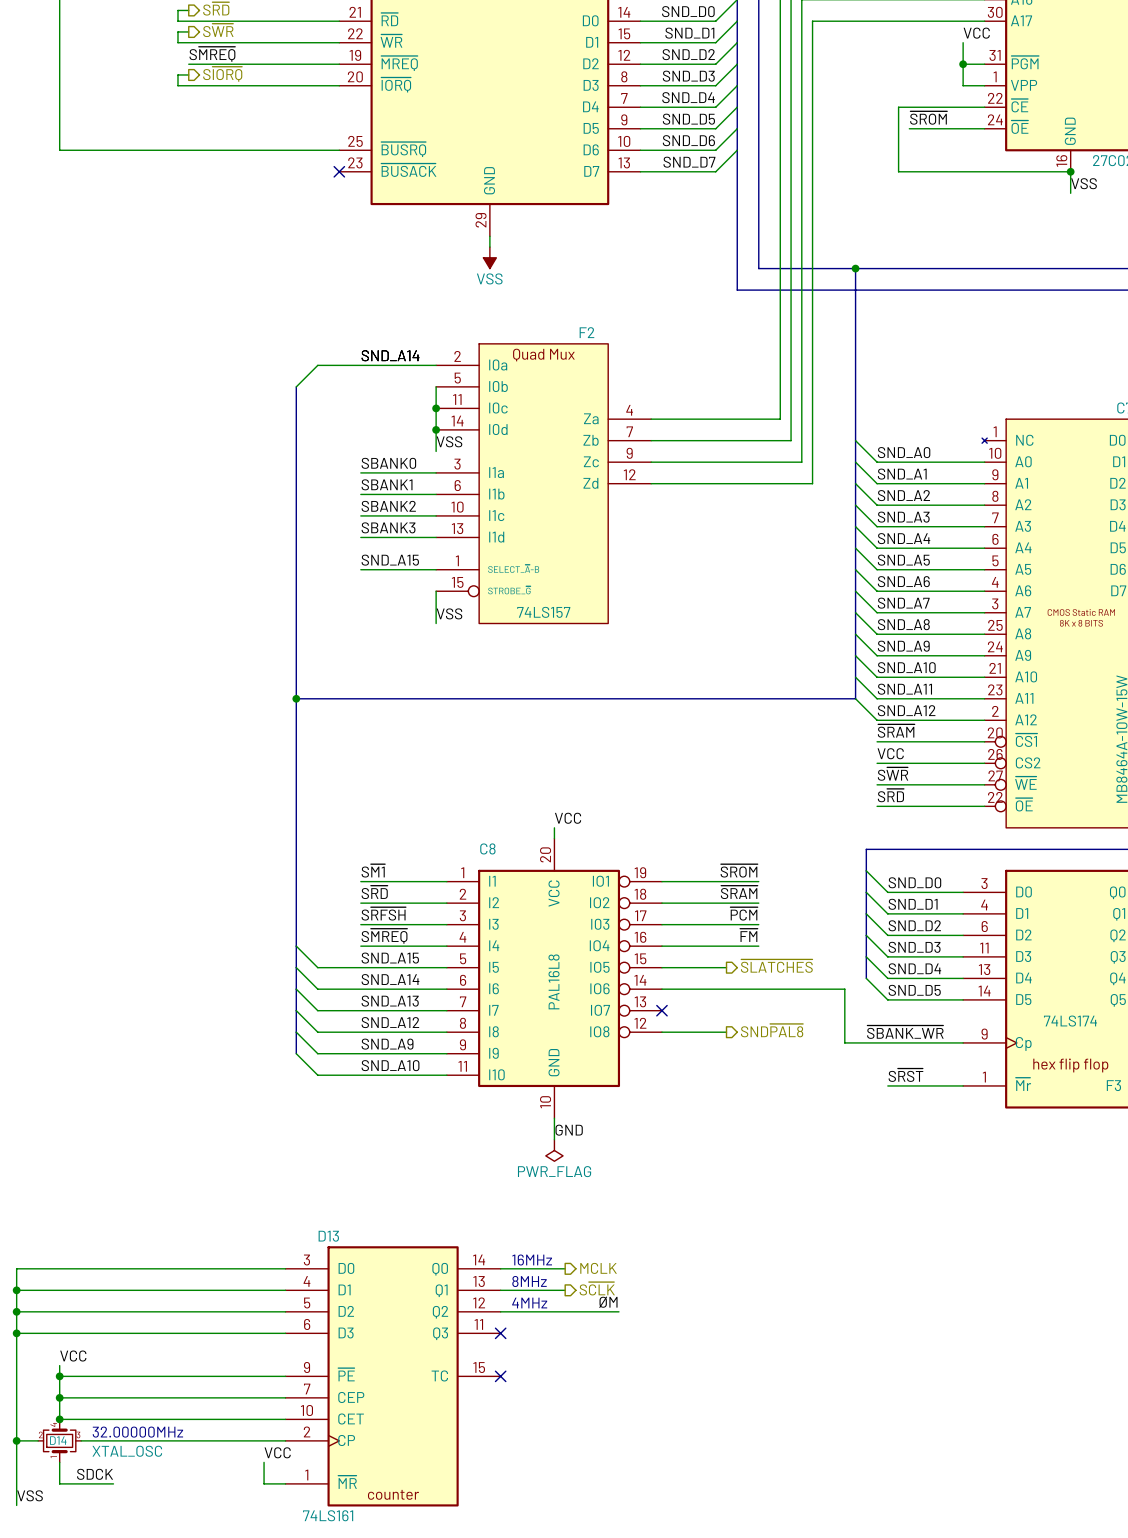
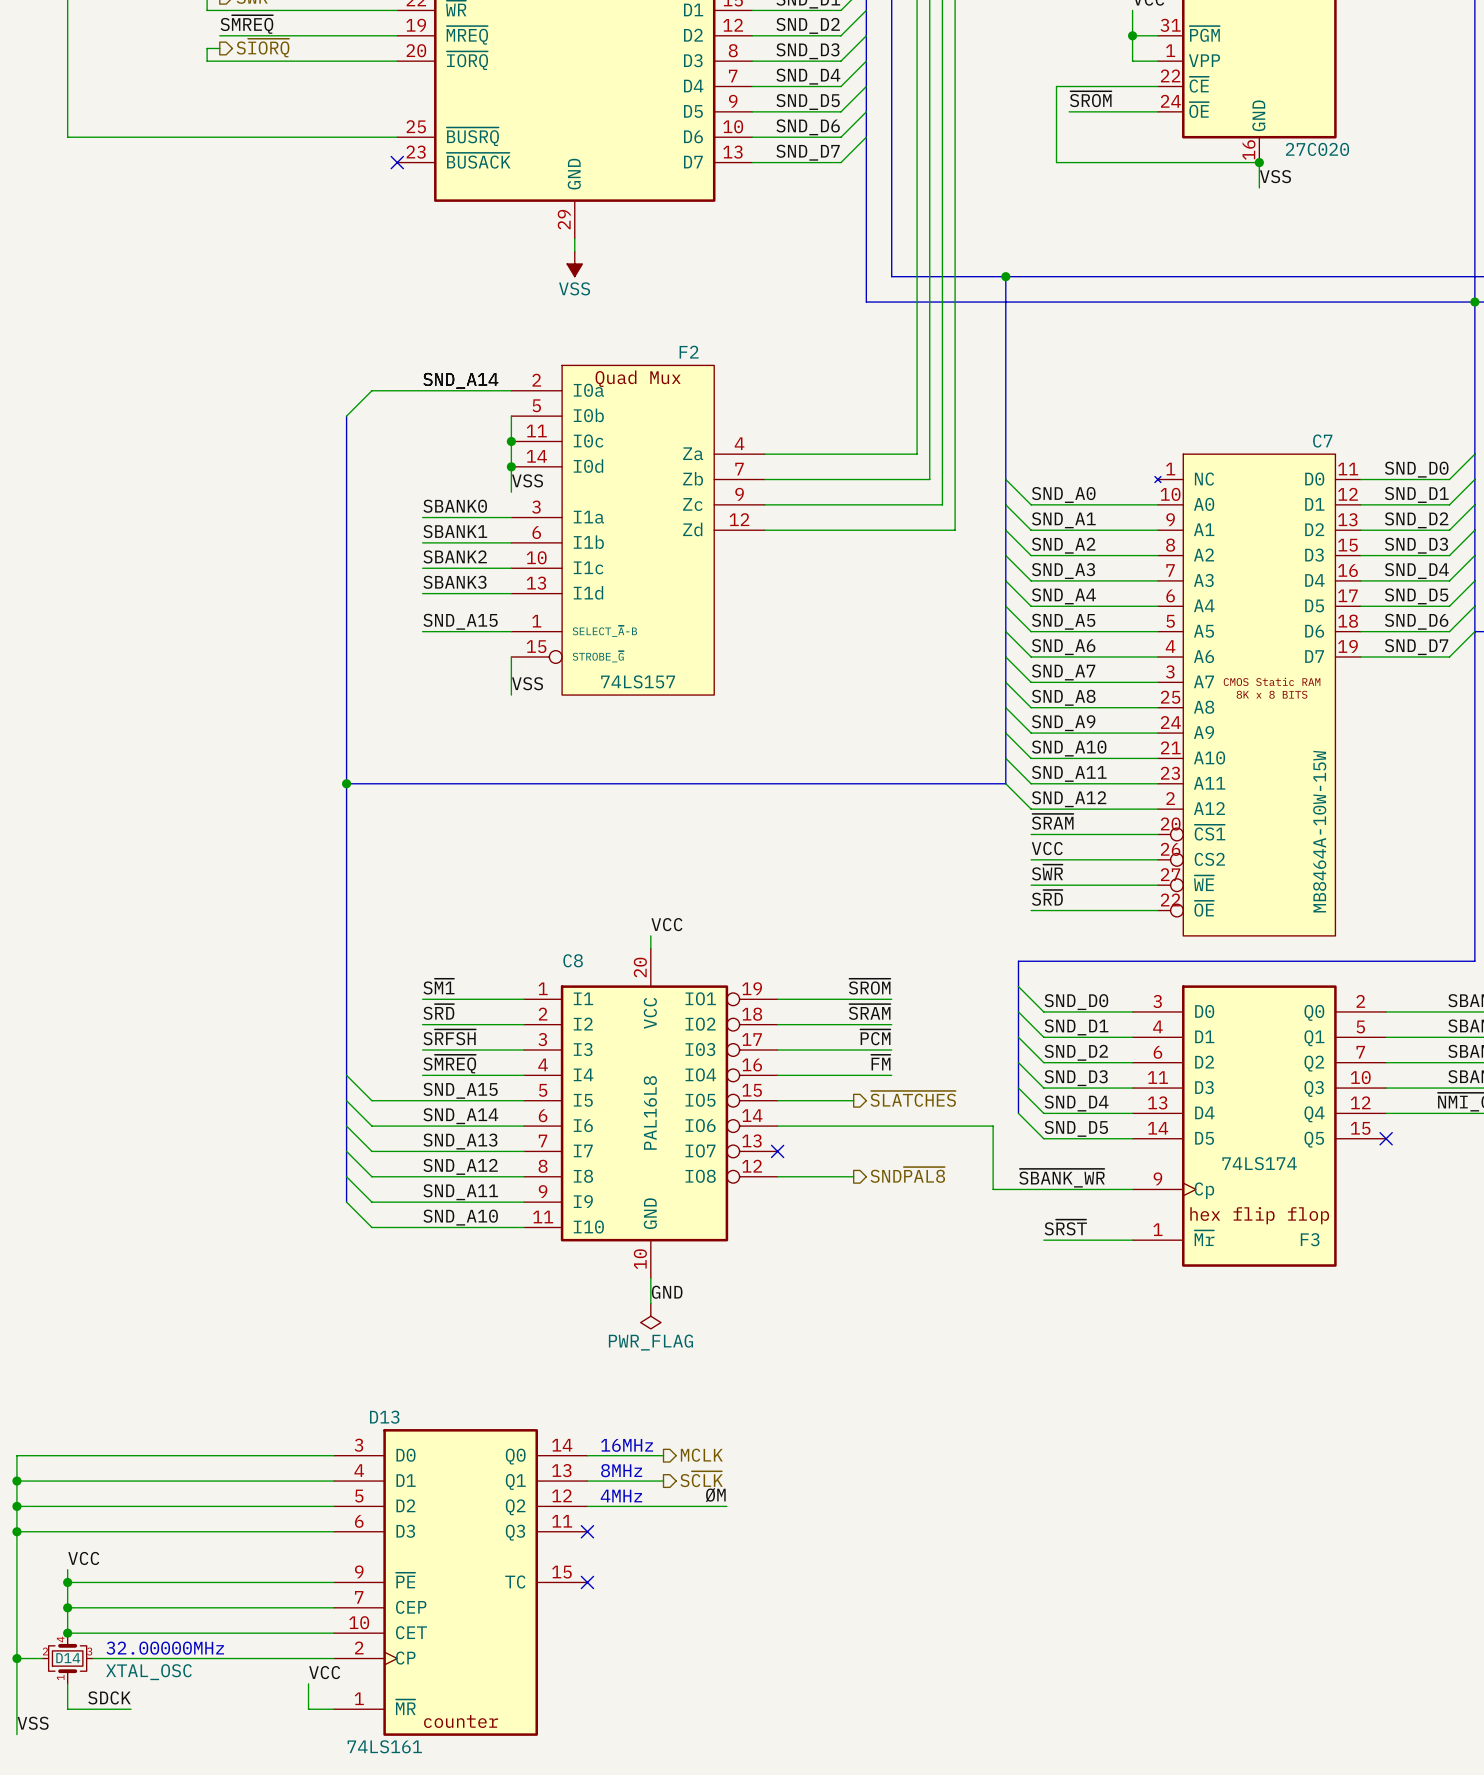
label: SND_A9 (387, 1044) -> SND_A11 (460, 1192)

